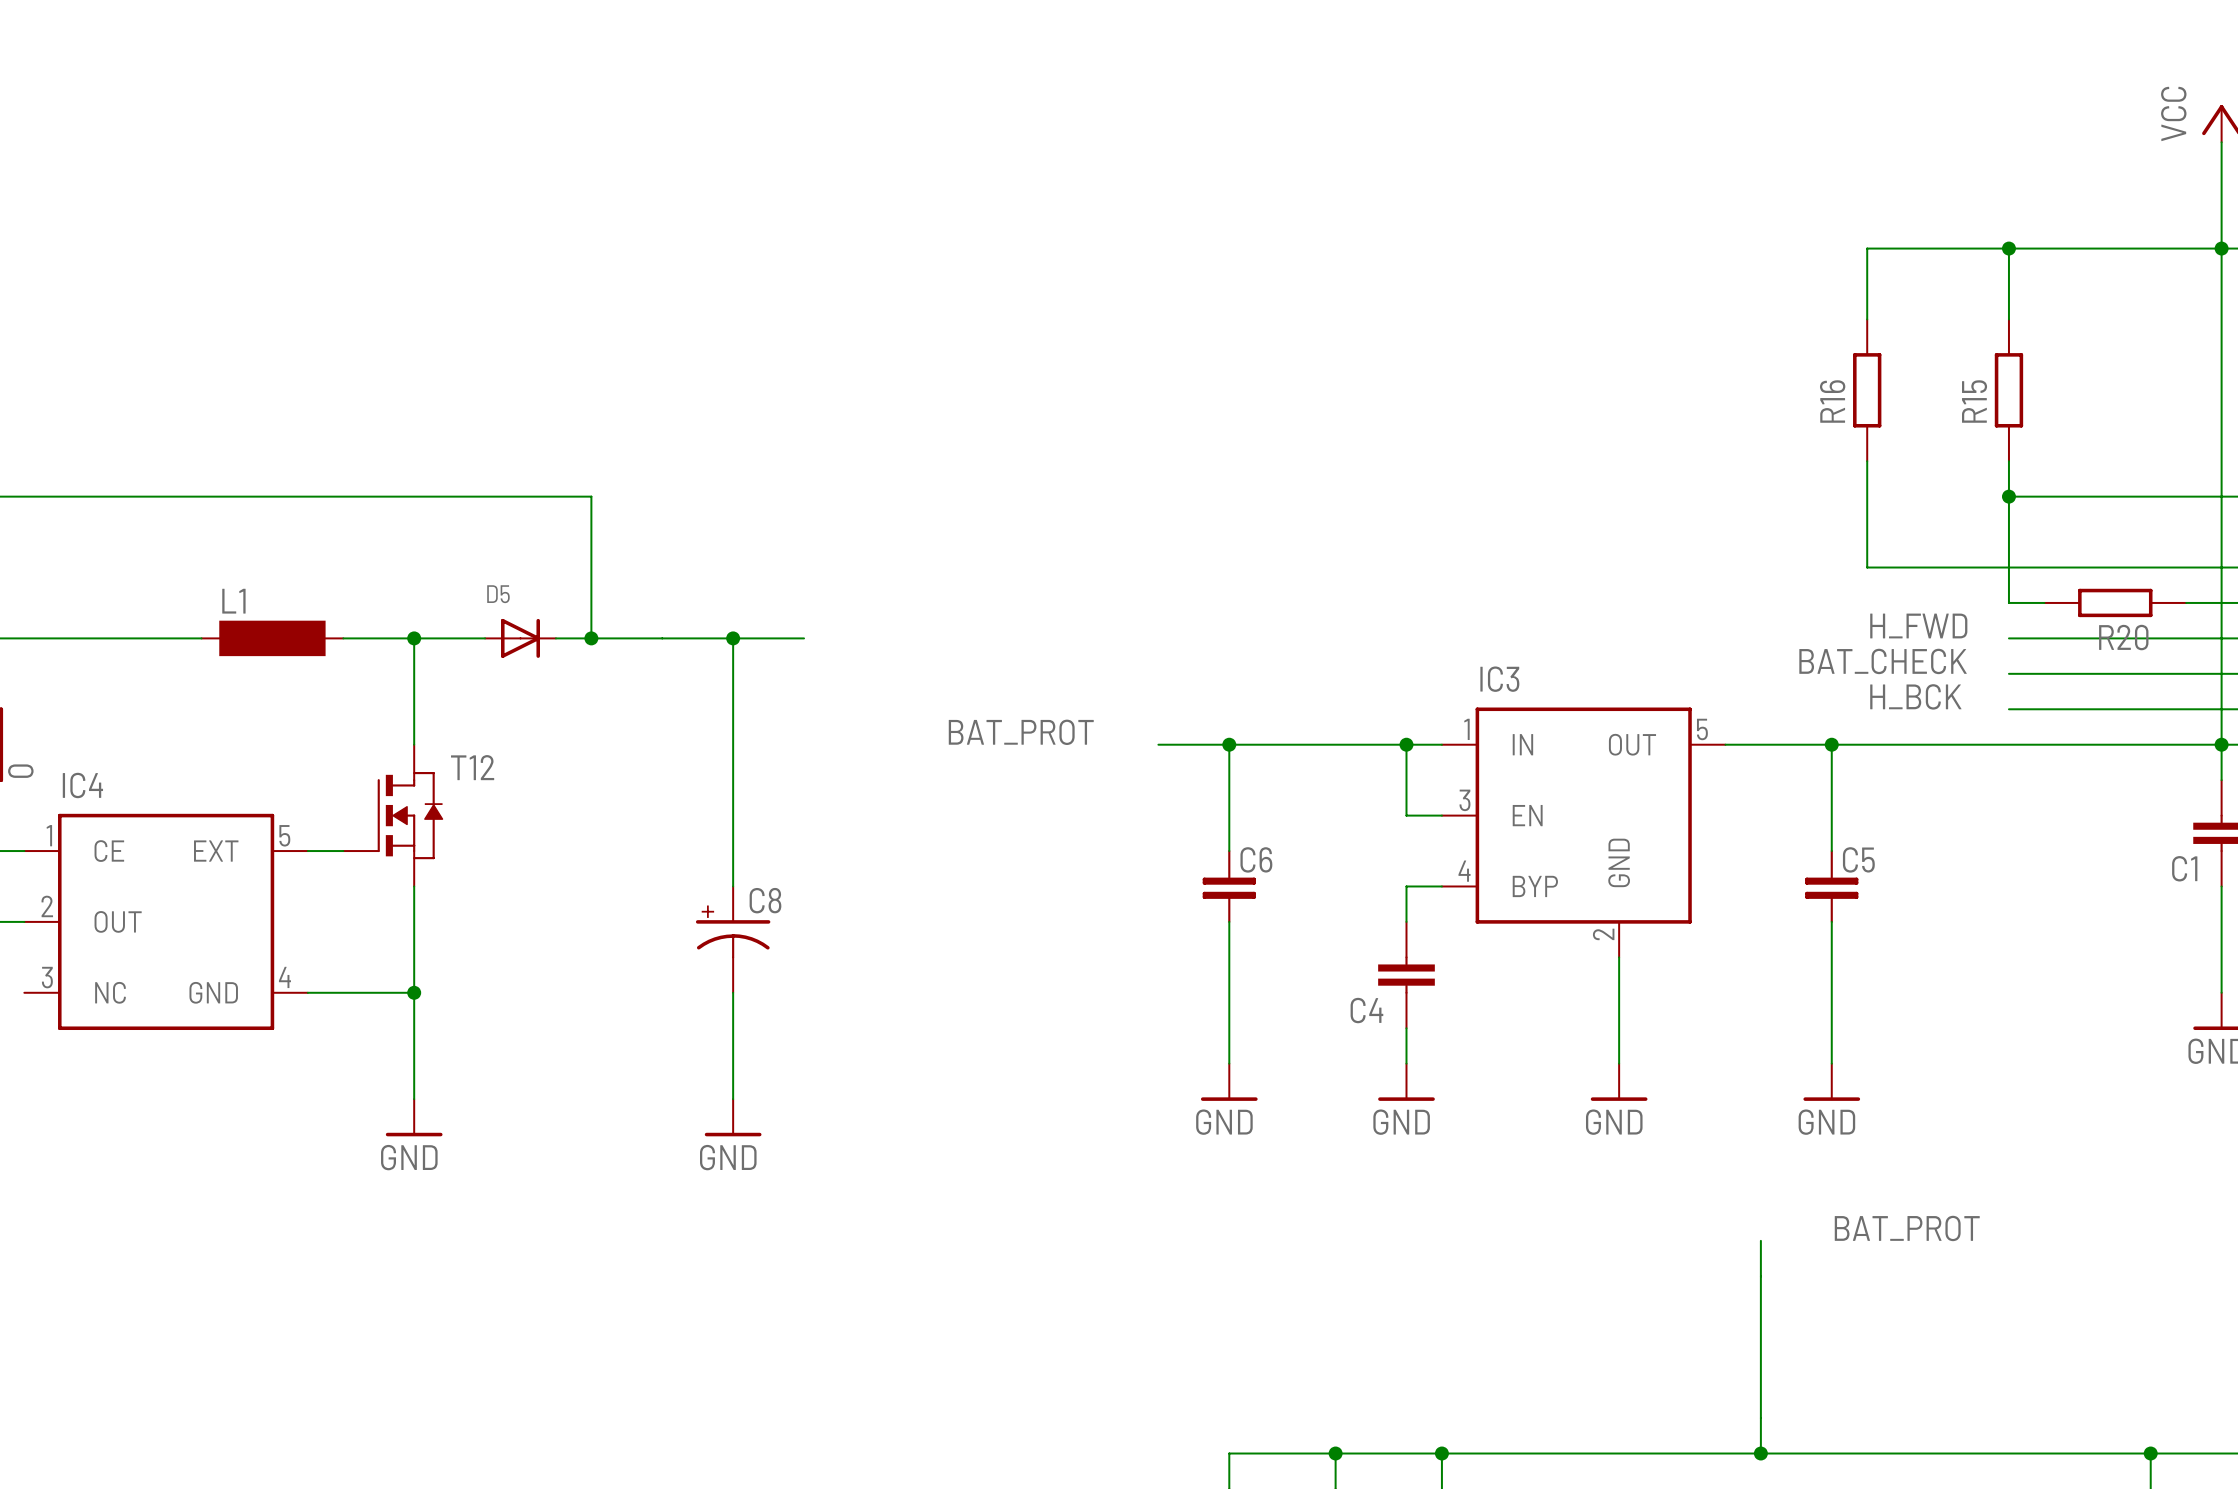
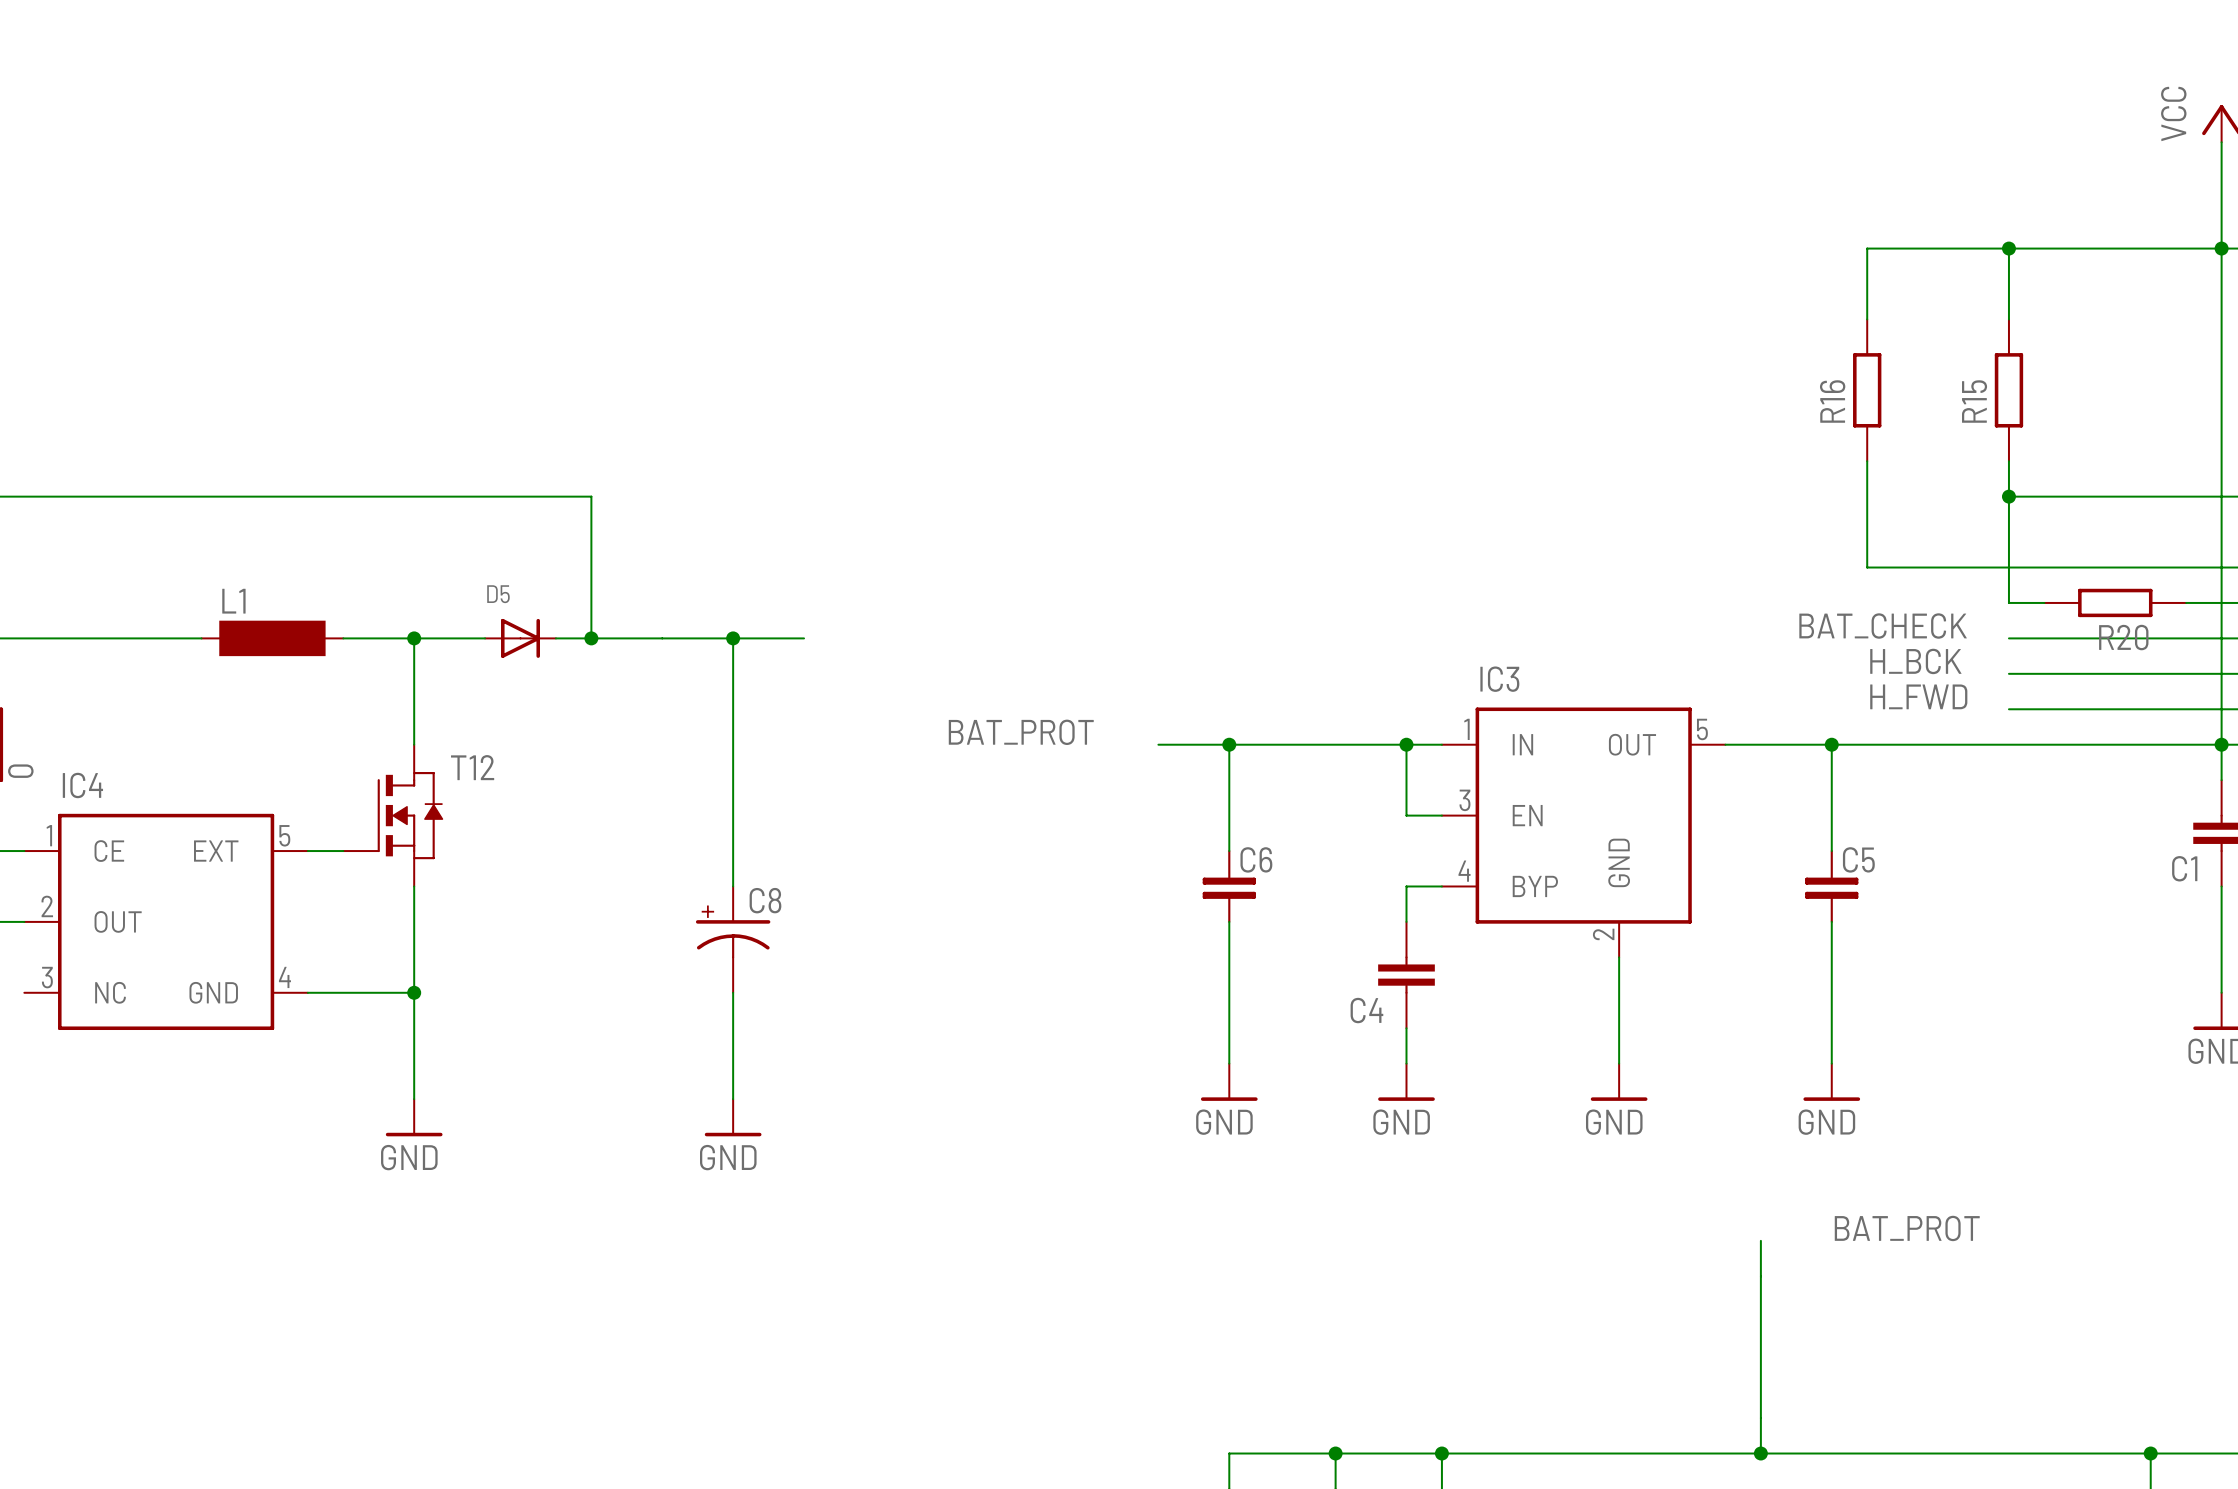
label: H_FWD (1918, 625) -> none
label position: BAT_CHECK (1883, 661) -> BAT_CHECK (1883, 626)
label: none -> H_BCK (1915, 661)
label: H_BCK (1915, 696) -> H_FWD (1918, 696)

